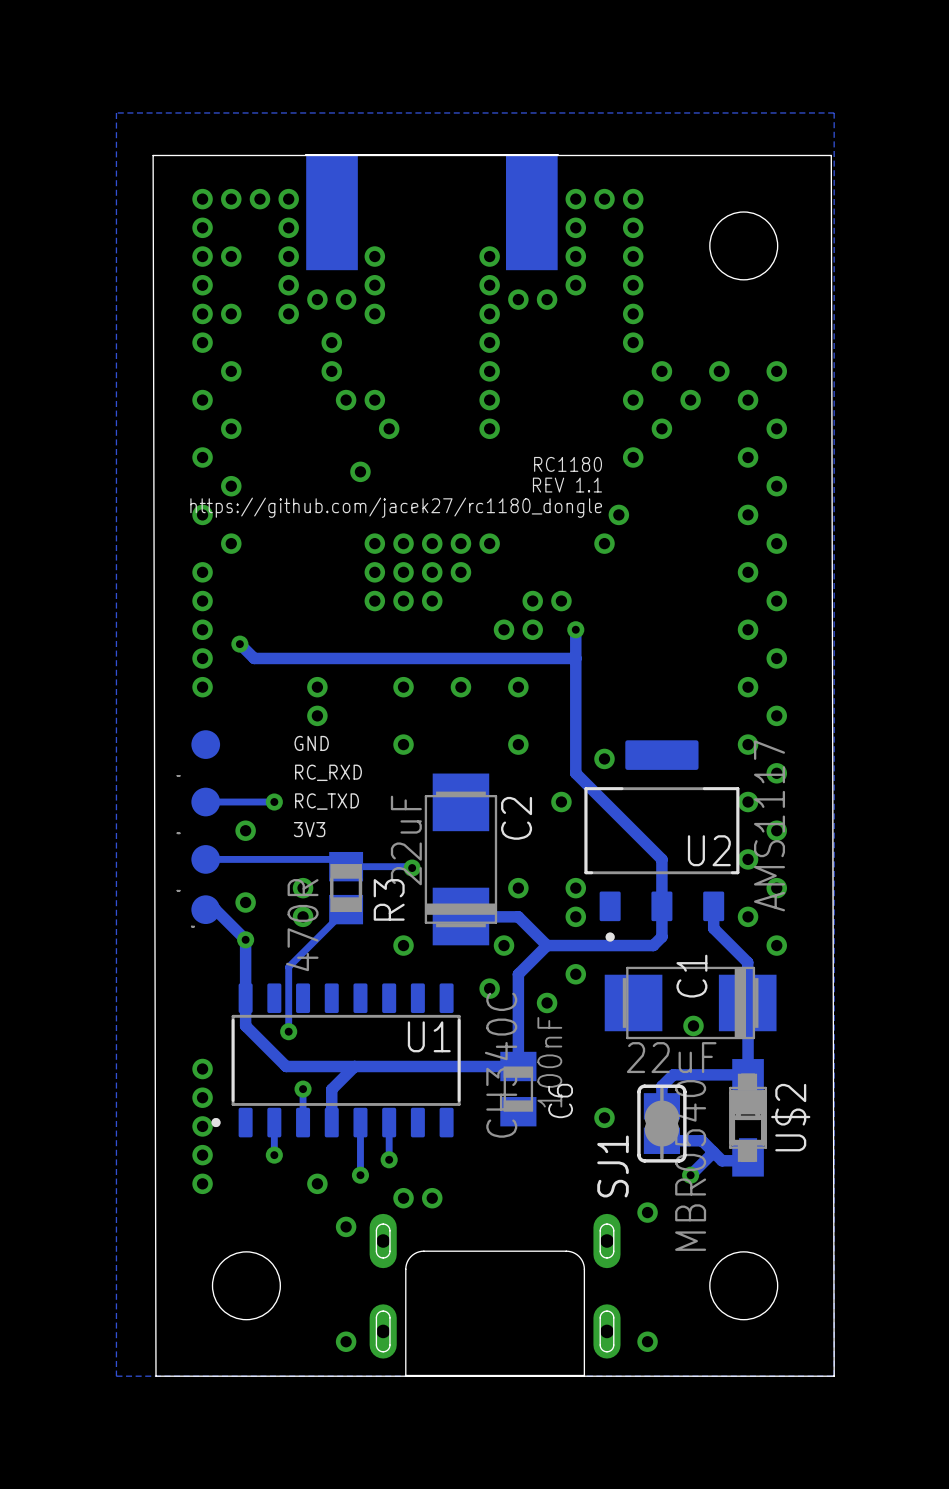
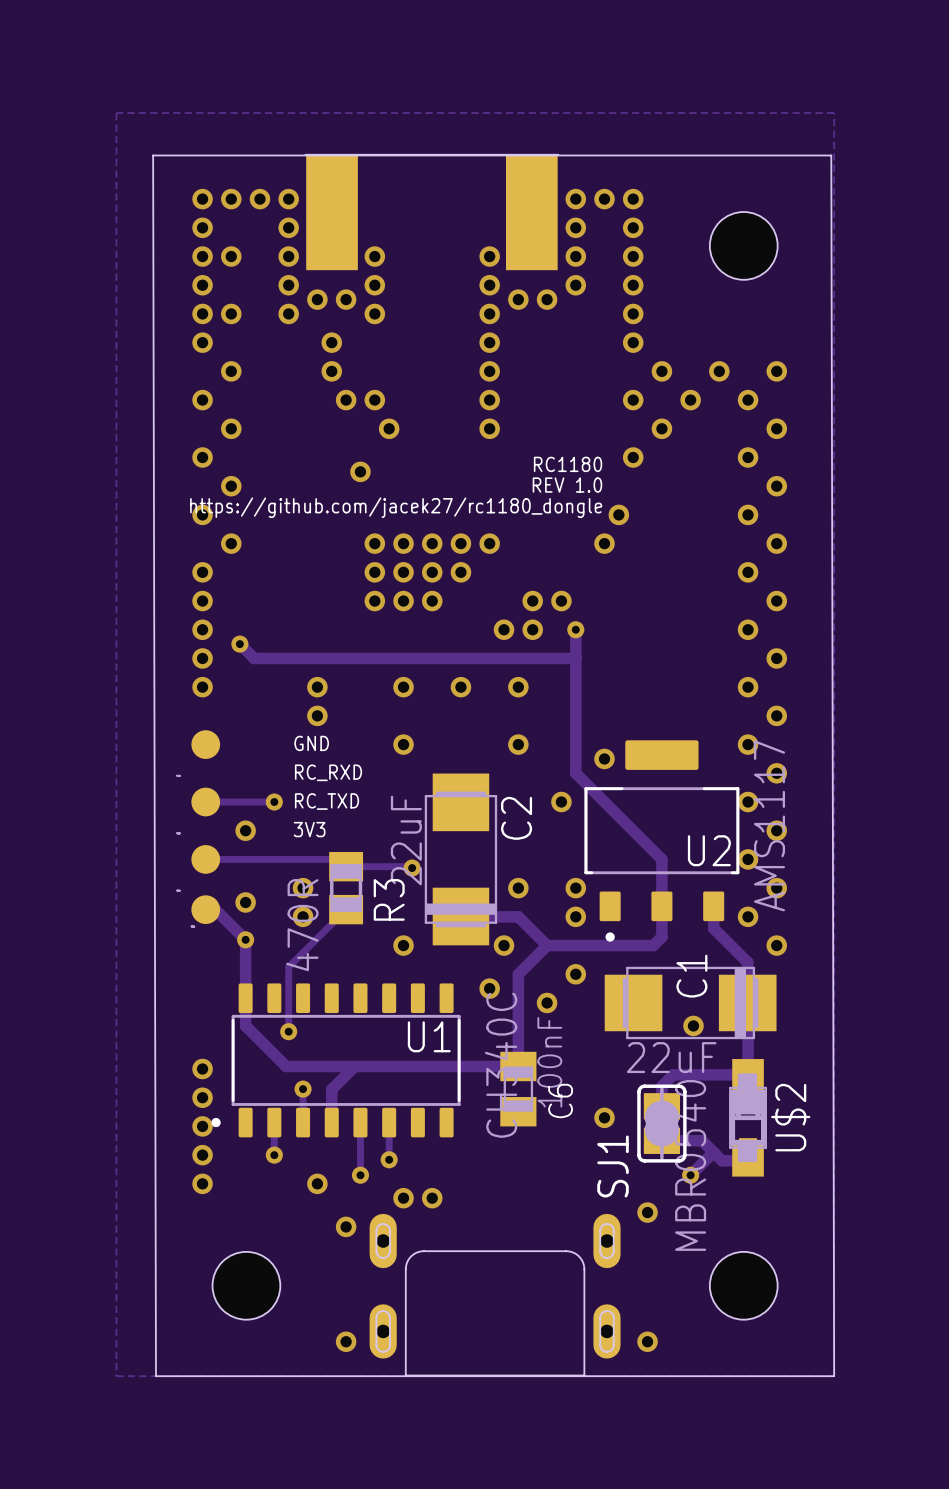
text: REV 1.1 (567, 485) -> REV 1.0 (567, 485)

